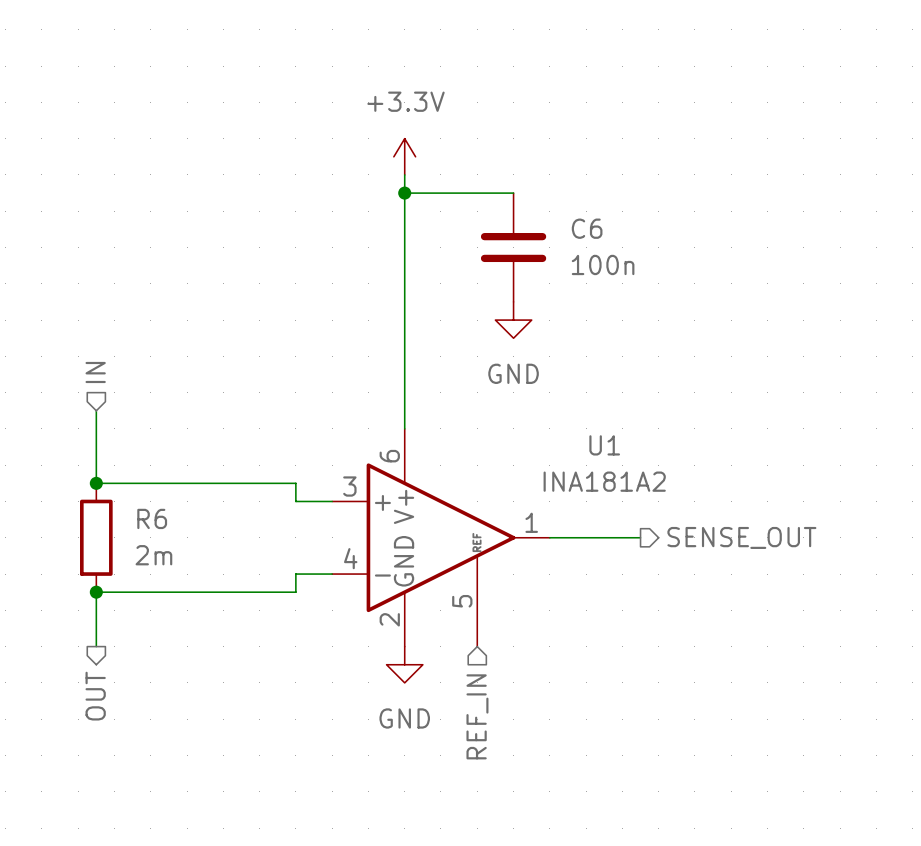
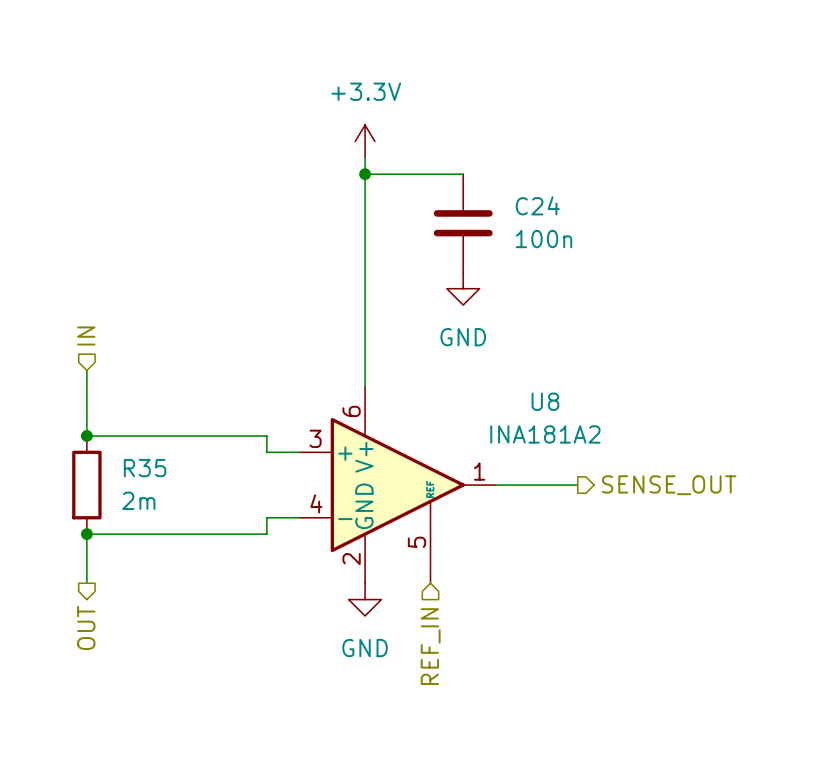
C6 name: C6 (587, 228) -> C24 (537, 205)
U1 name: U1 (604, 445) -> U8 (545, 401)
R6 name: R6 (152, 518) -> R35 (145, 468)

